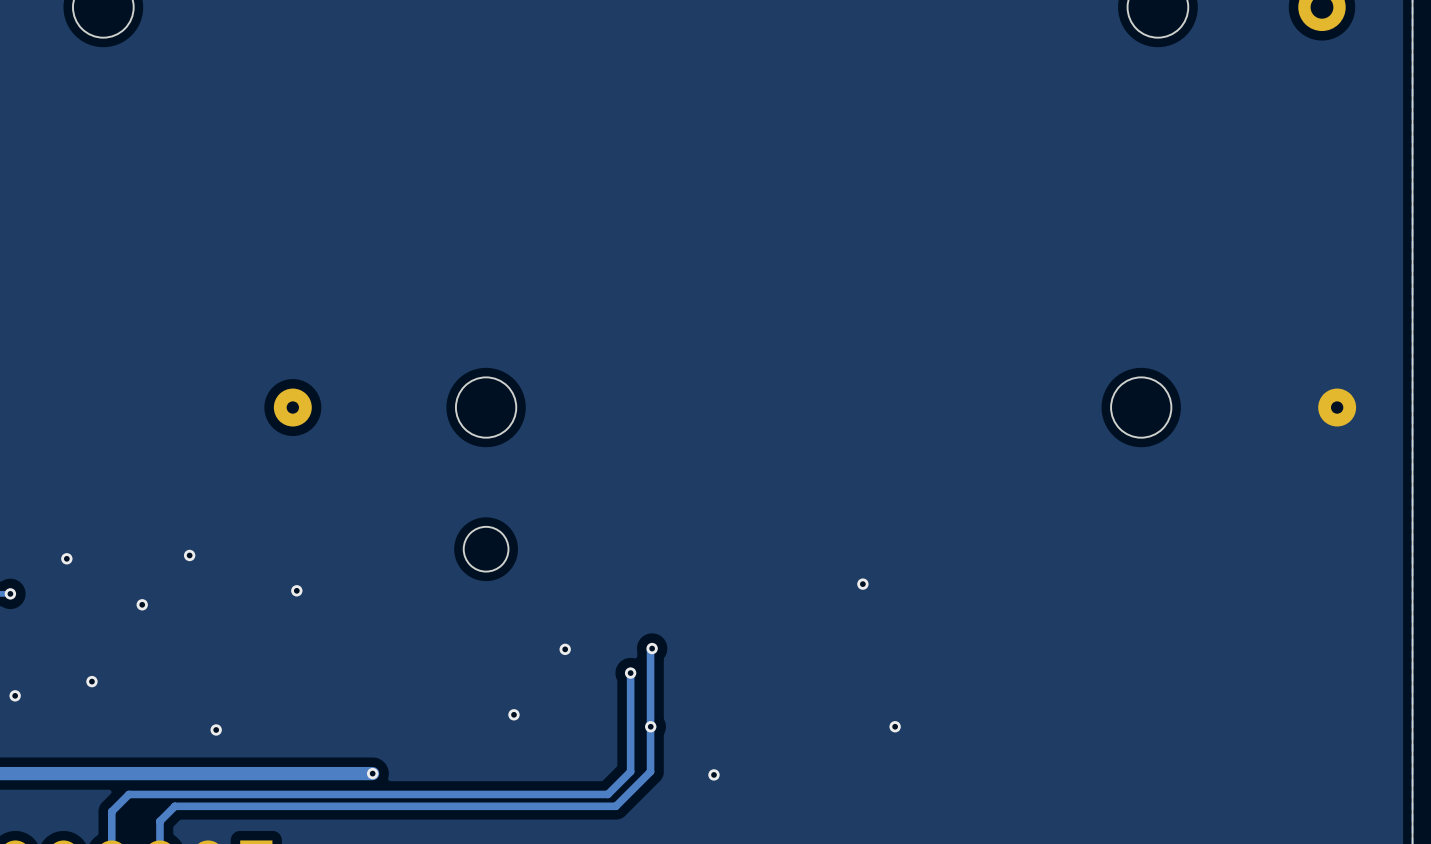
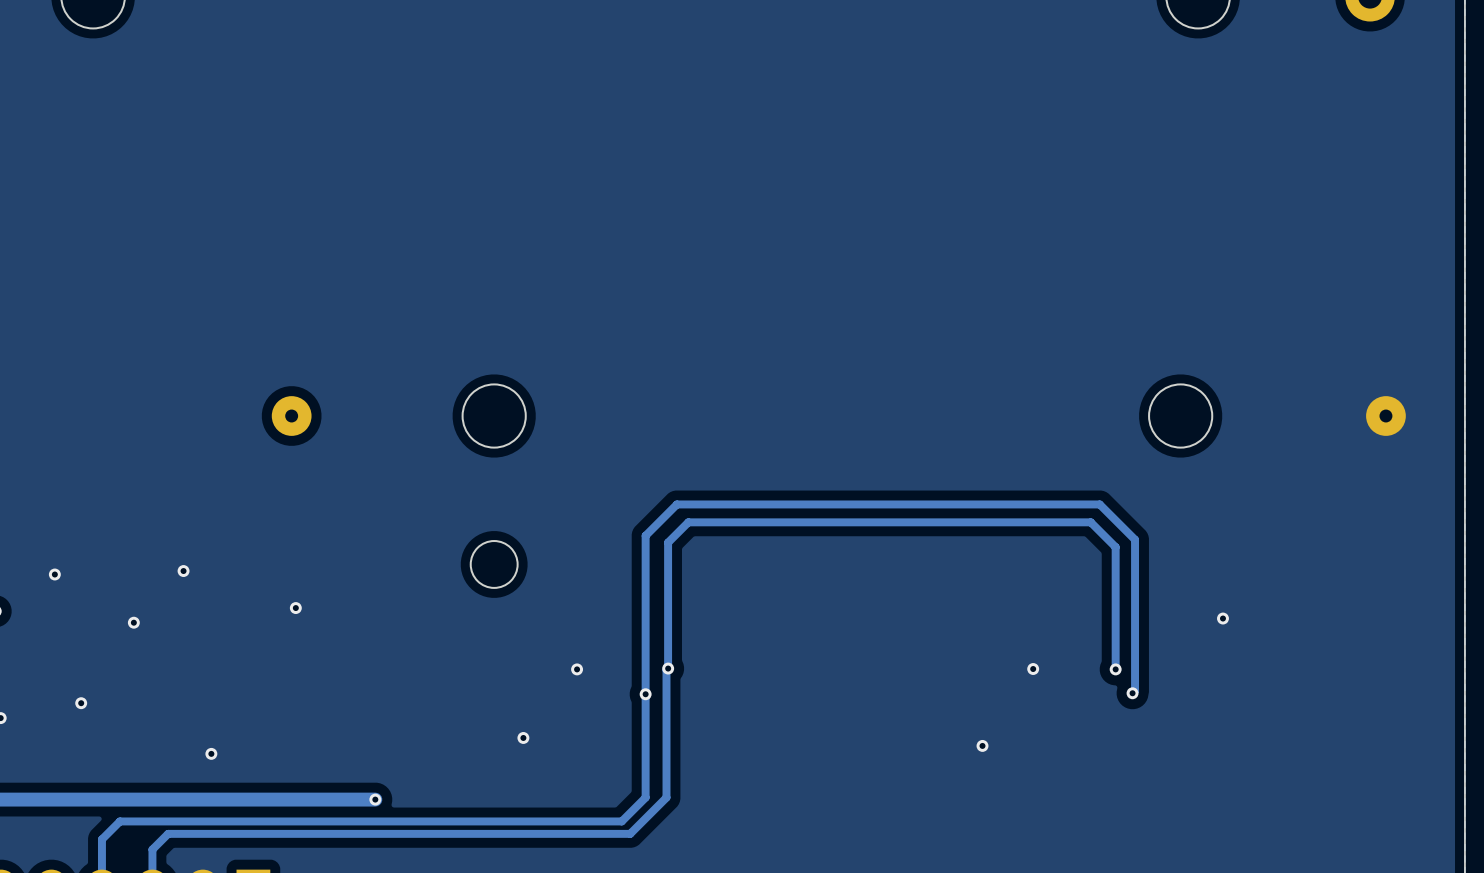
via: (862, 584) -> none
via: none -> (1222, 618)
track: none -> (668, 668) (668, 542) (688, 522) (1090, 522) (1115, 547) (1115, 669)
via: none -> (1033, 669)
via: none -> (1115, 669)
track: none -> (1132, 693) (1135, 690) (1135, 539) (1099, 504) (676, 504) (645, 535) (645, 694)
via: none -> (1132, 693)
via: (650, 726) -> none
via position: (895, 726) -> (982, 745)
via: (713, 774) -> none

